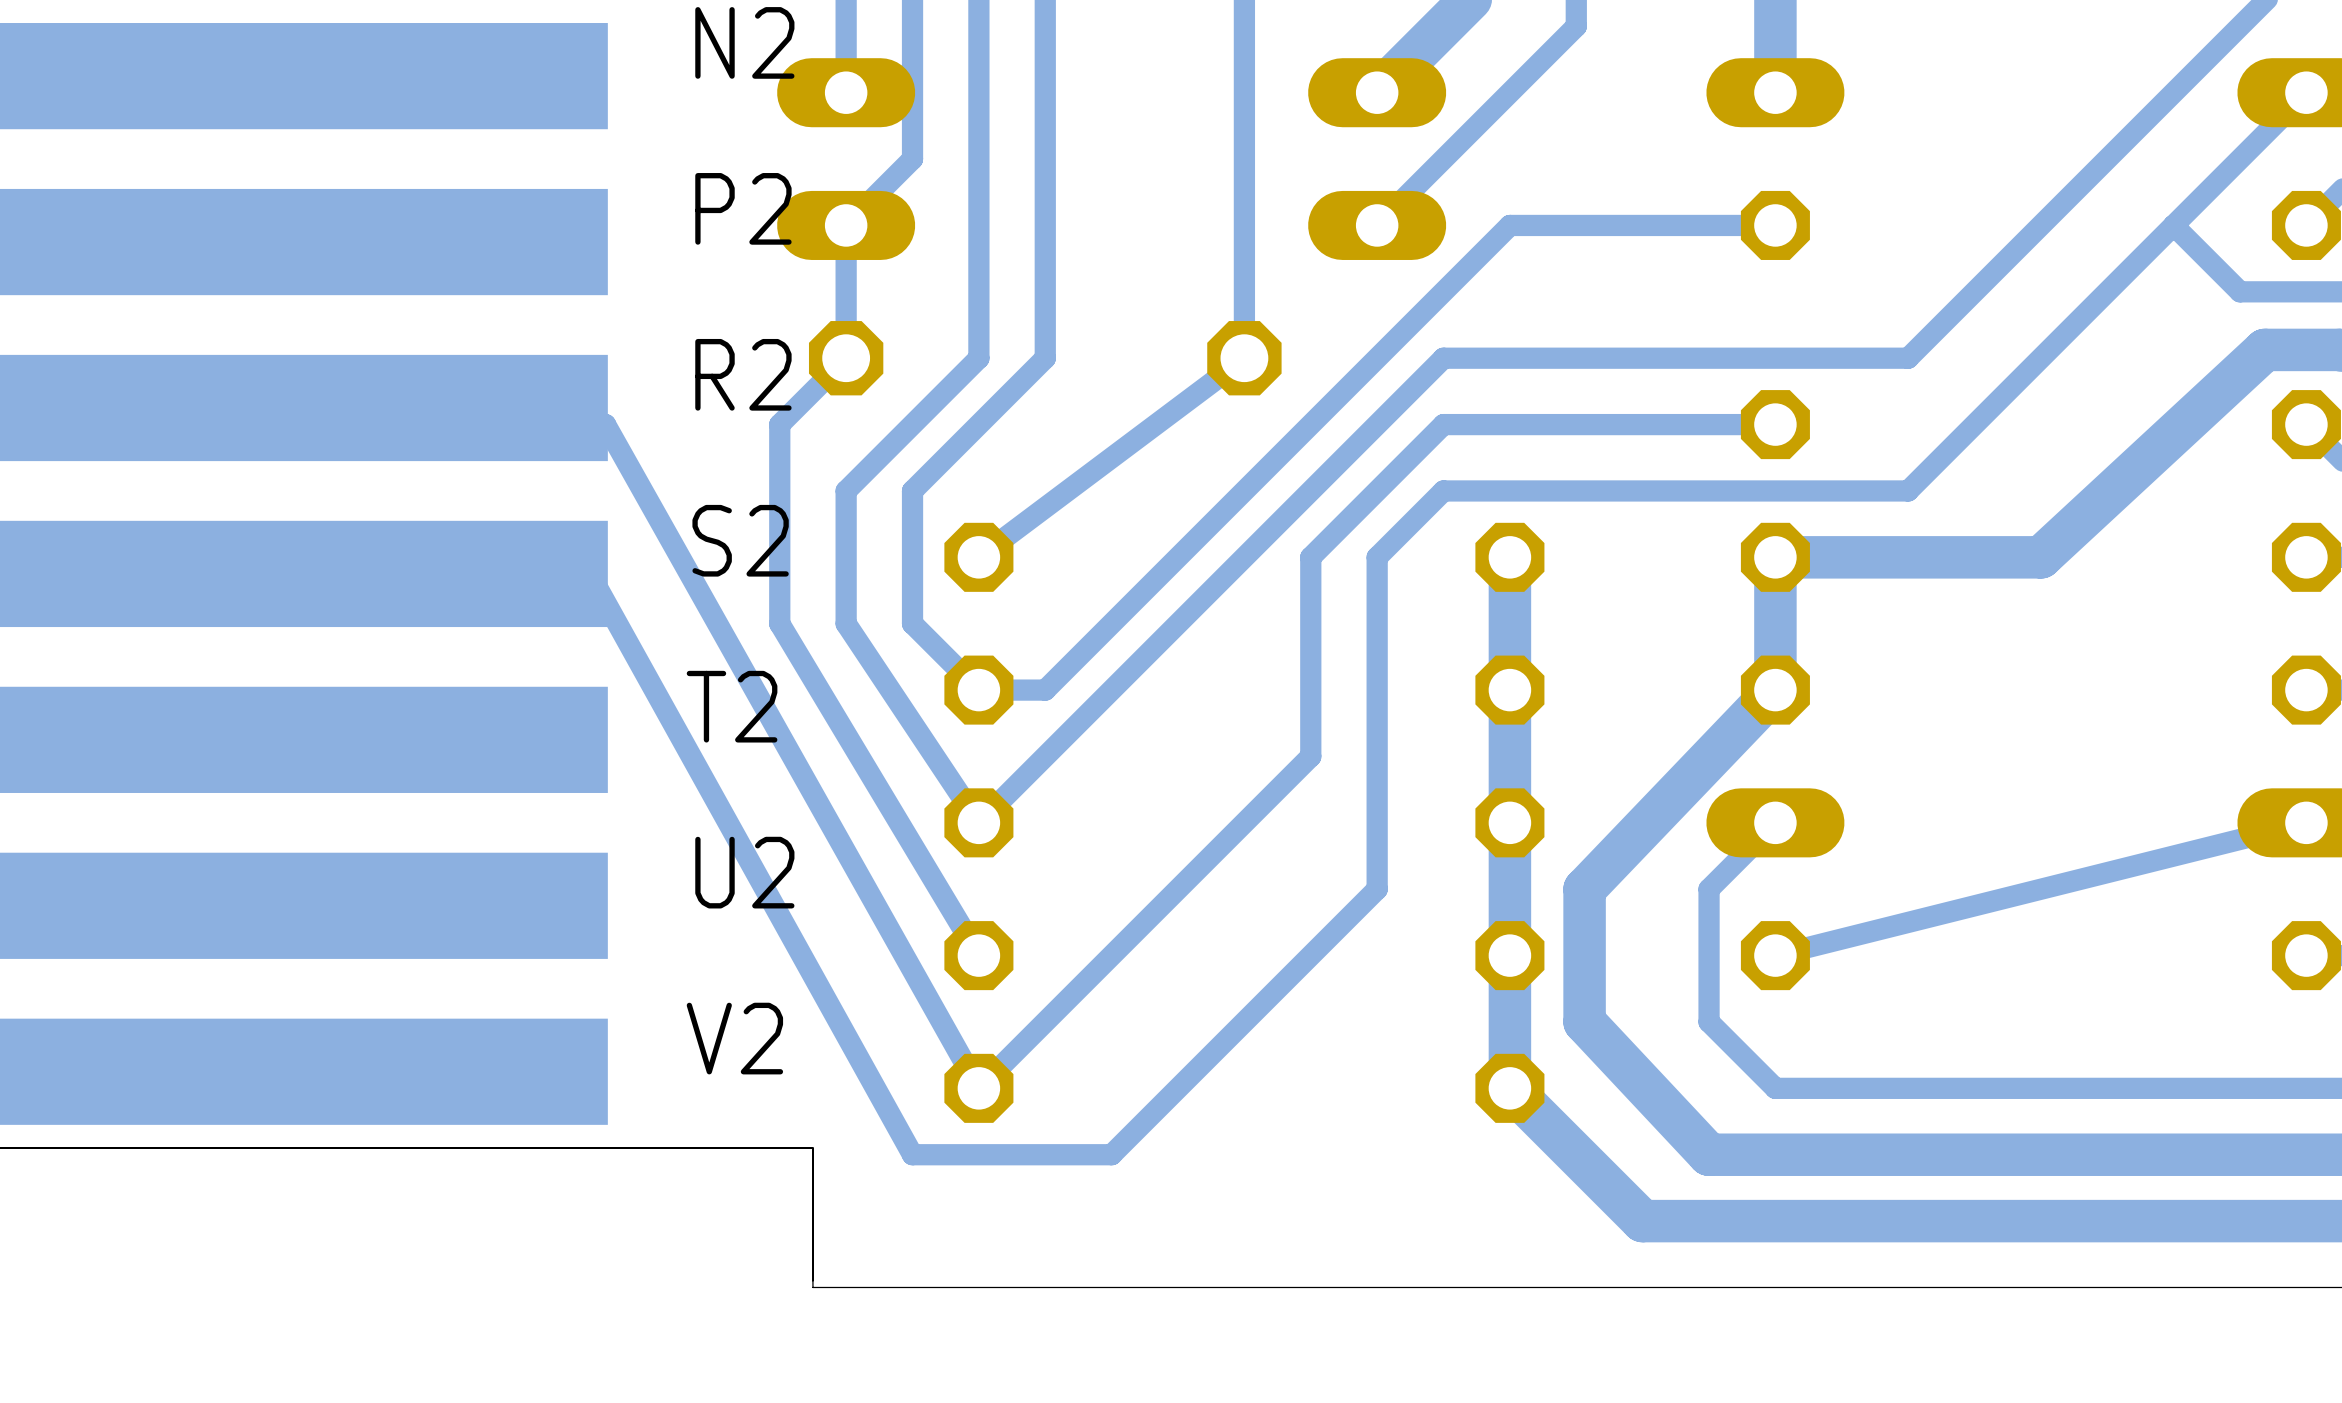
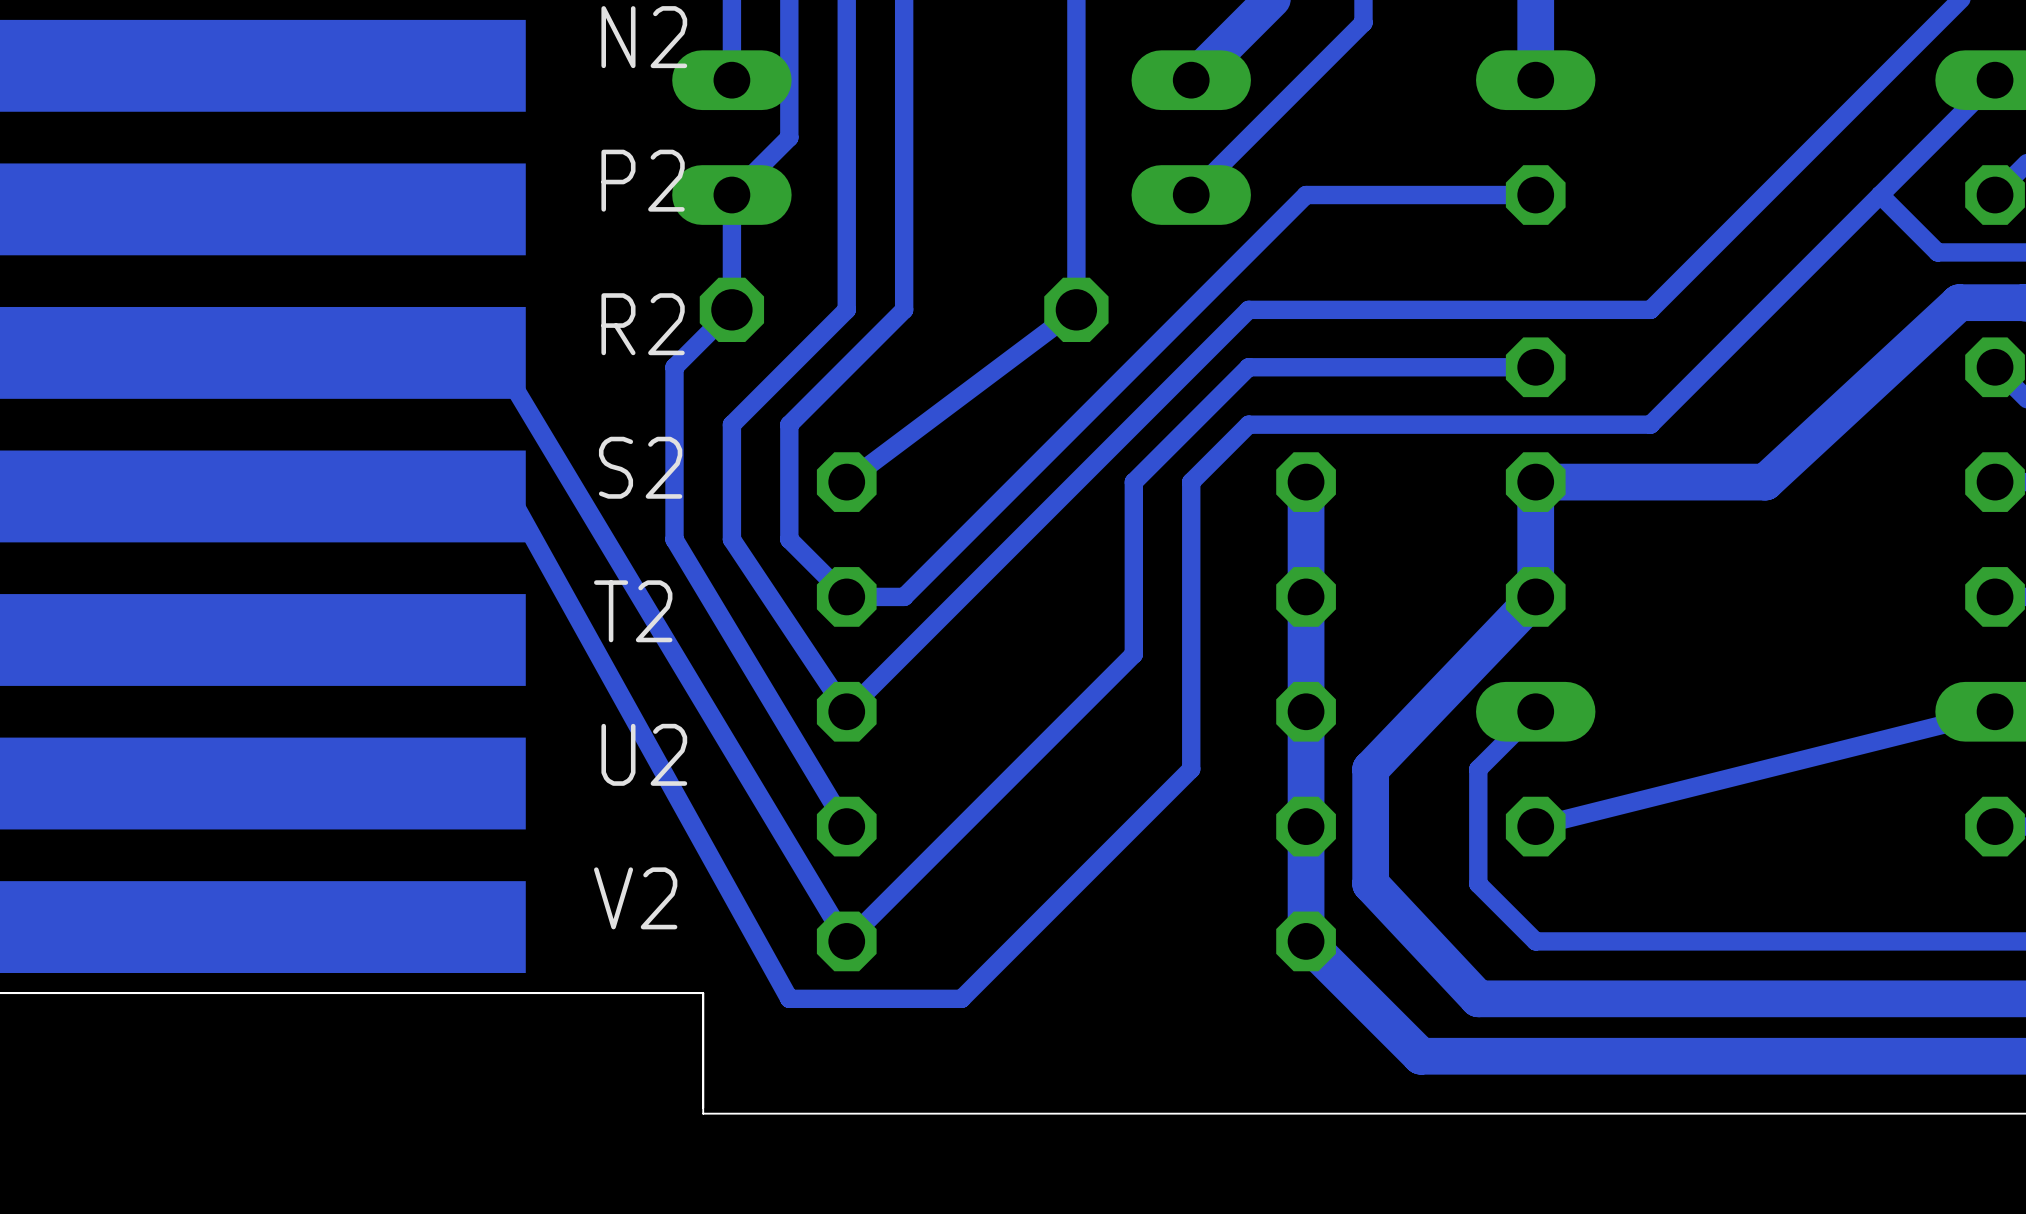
bottom track: (580, 424) (605, 424) (978, 1088) -> (502, 367) (846, 941)

